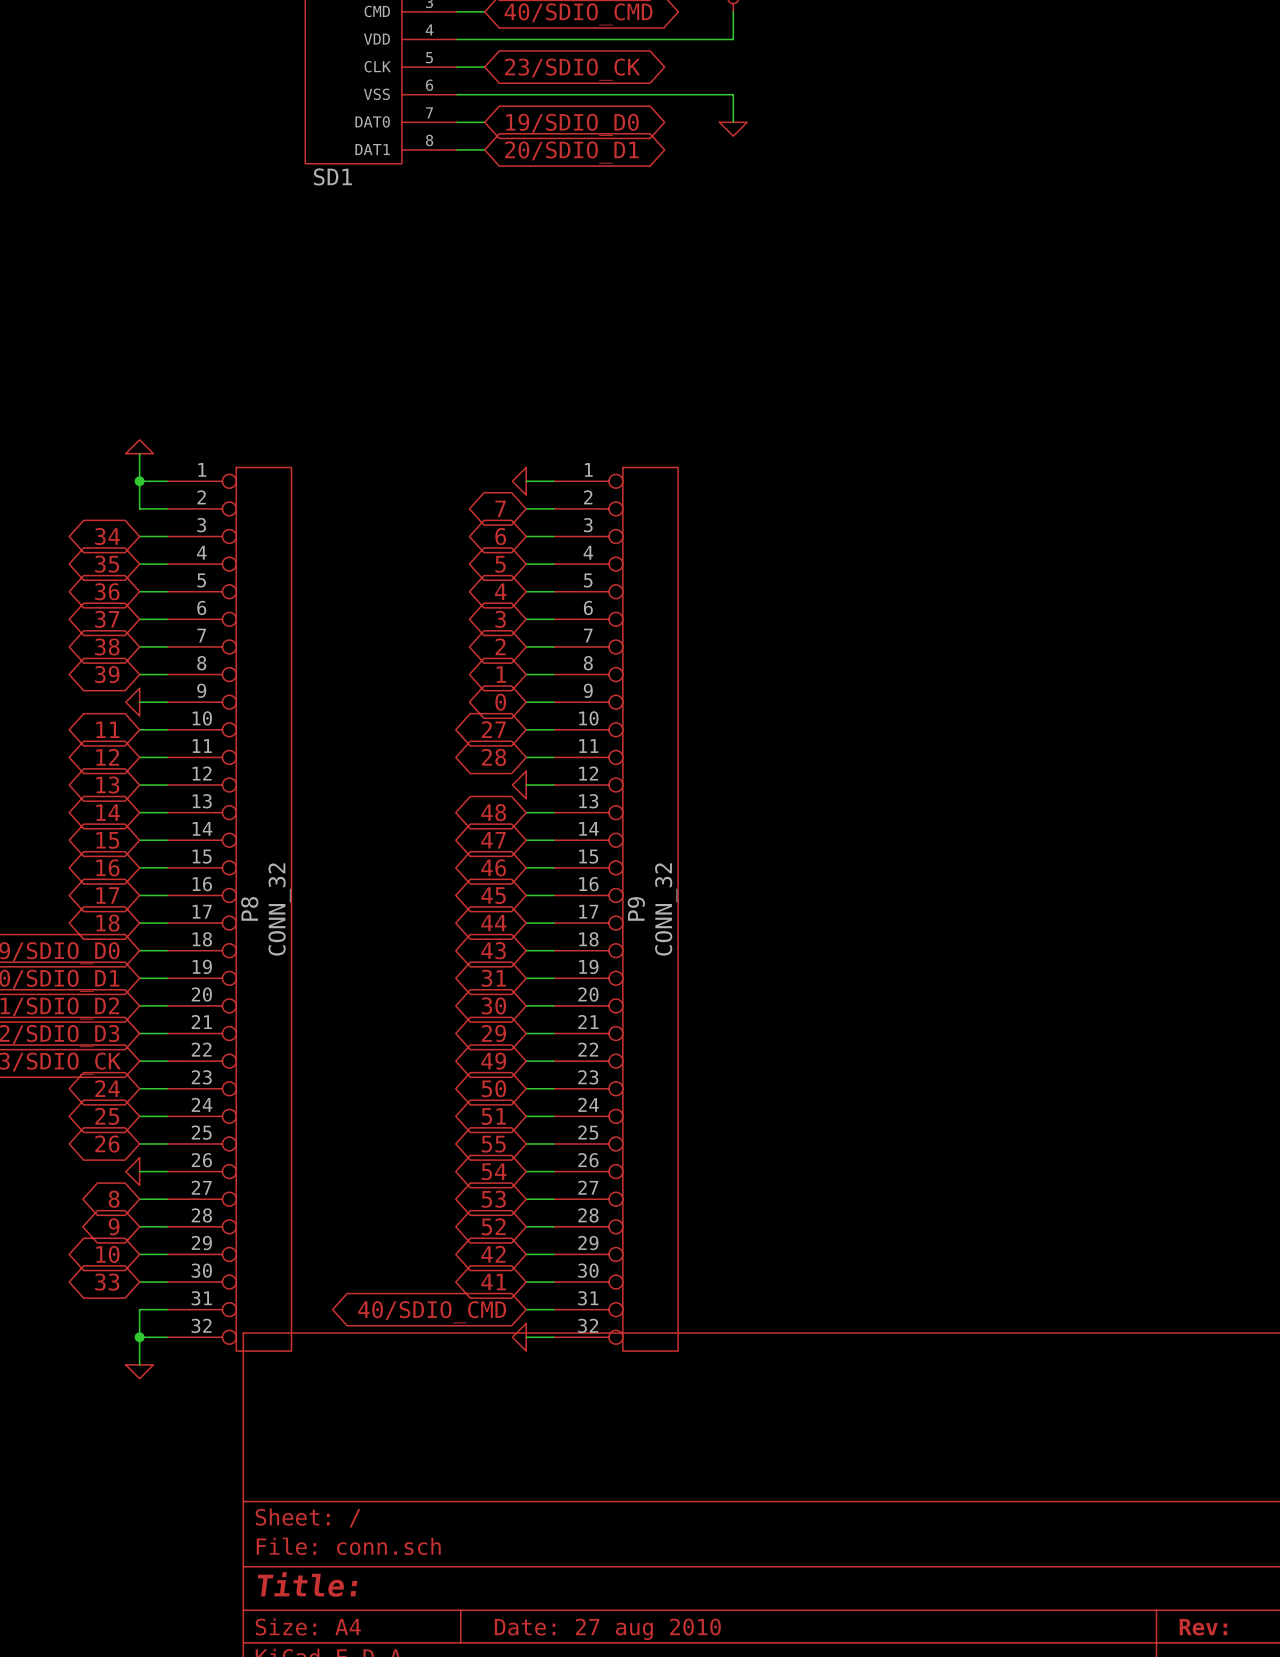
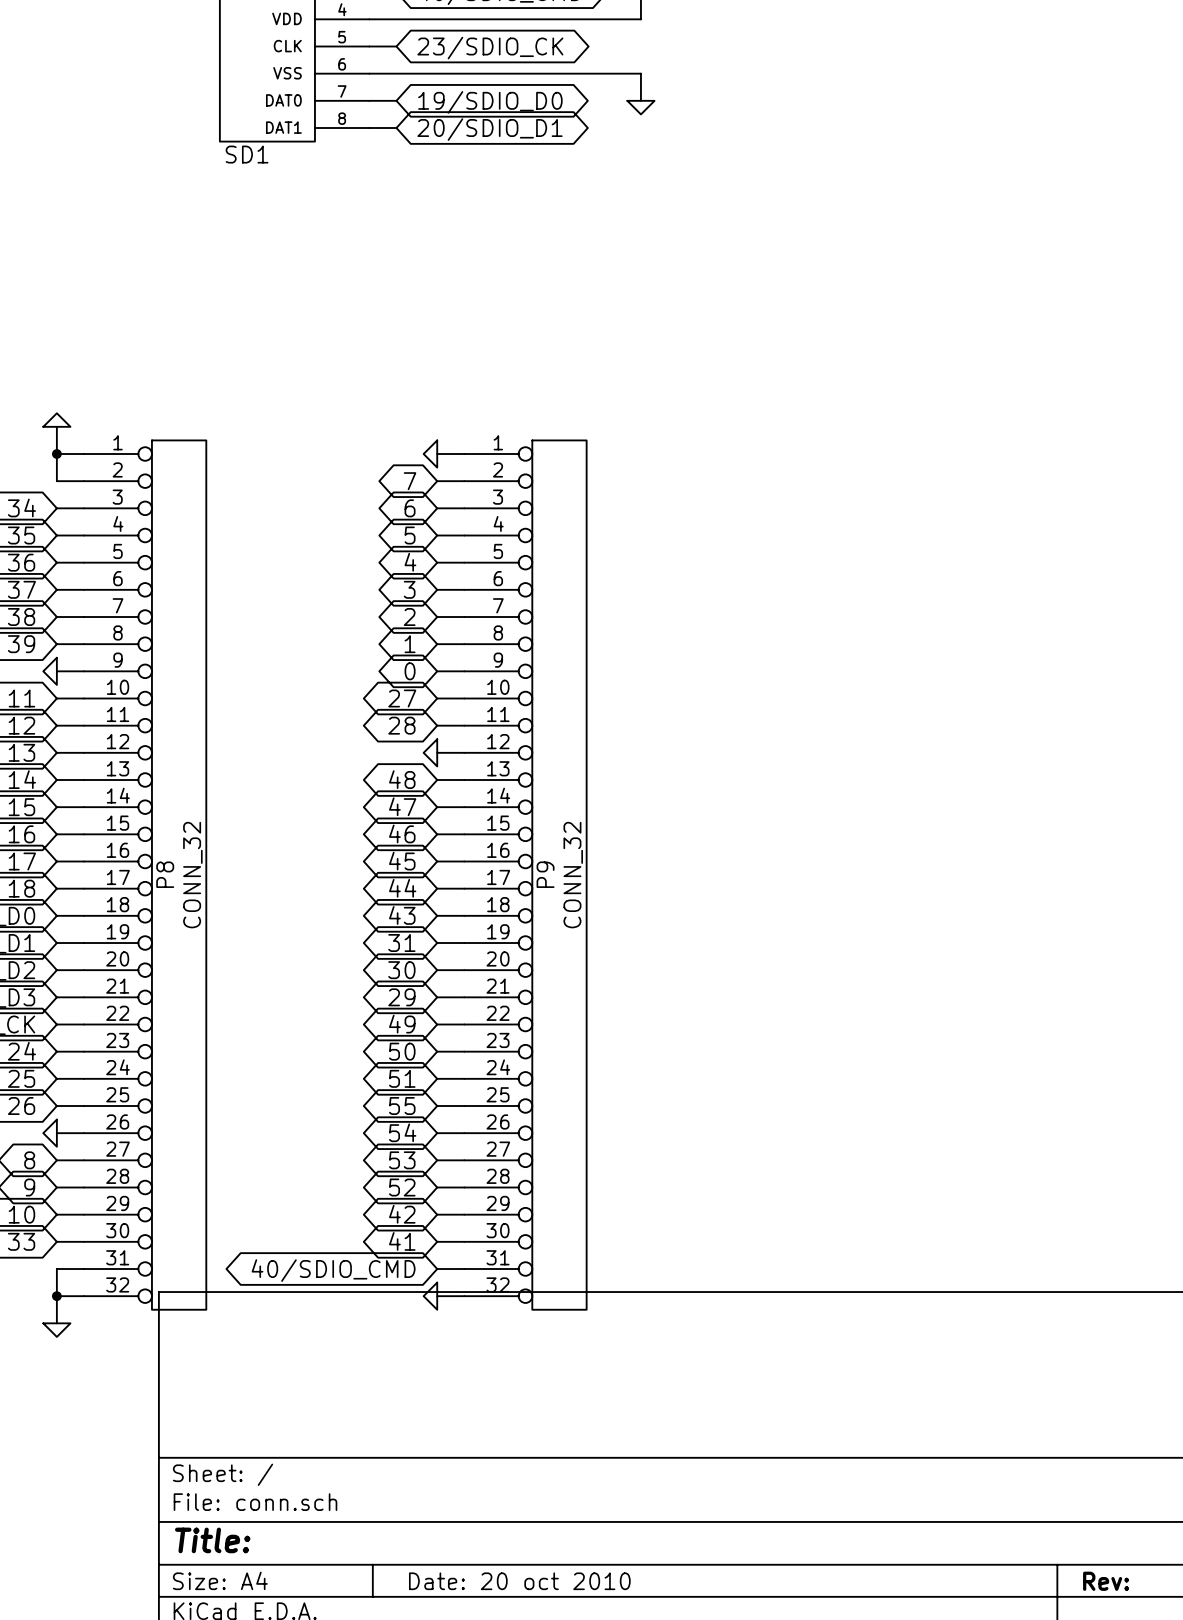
title block: Date: 27 aug 2010 (607, 1629) -> Date: 20 oct 2010 (519, 1581)

